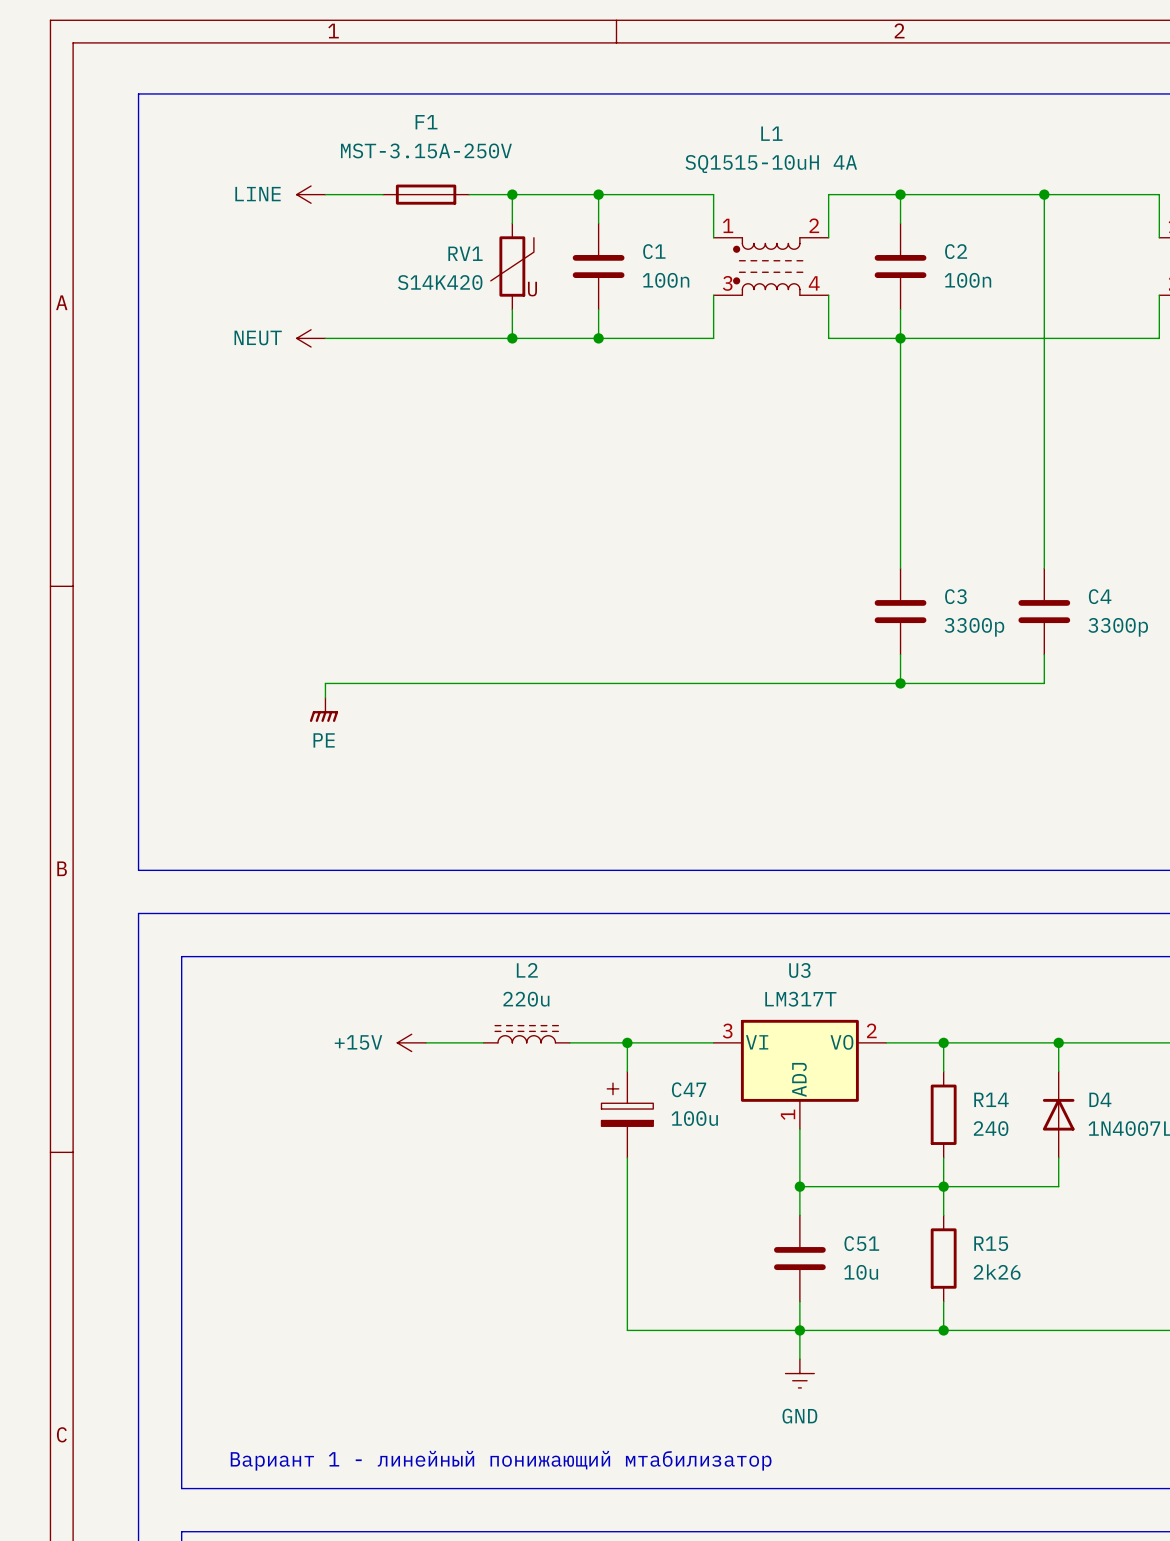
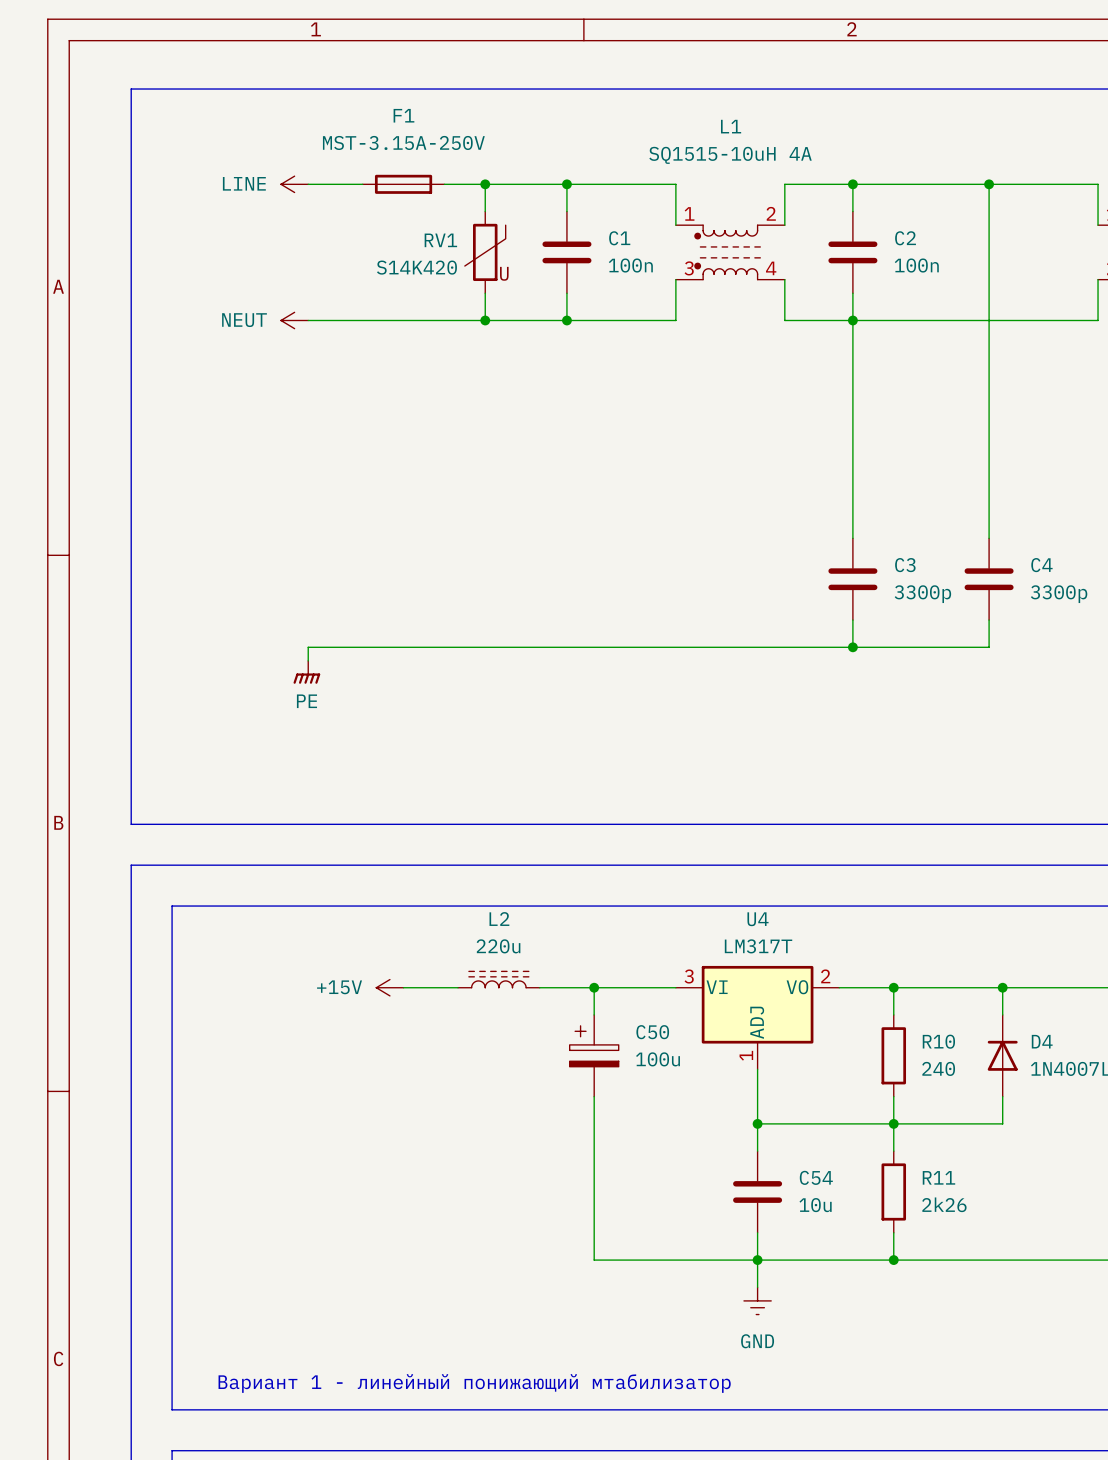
U3 name: U3 (799, 970) -> U4 (758, 919)
C47 name: C47 (689, 1089) -> C50 (652, 1032)
R14 name: R14 (991, 1099) -> R10 (938, 1041)
C51 name: C51 (861, 1243) -> C54 (816, 1177)
R15 name: R15 (991, 1243) -> R11 (938, 1177)

